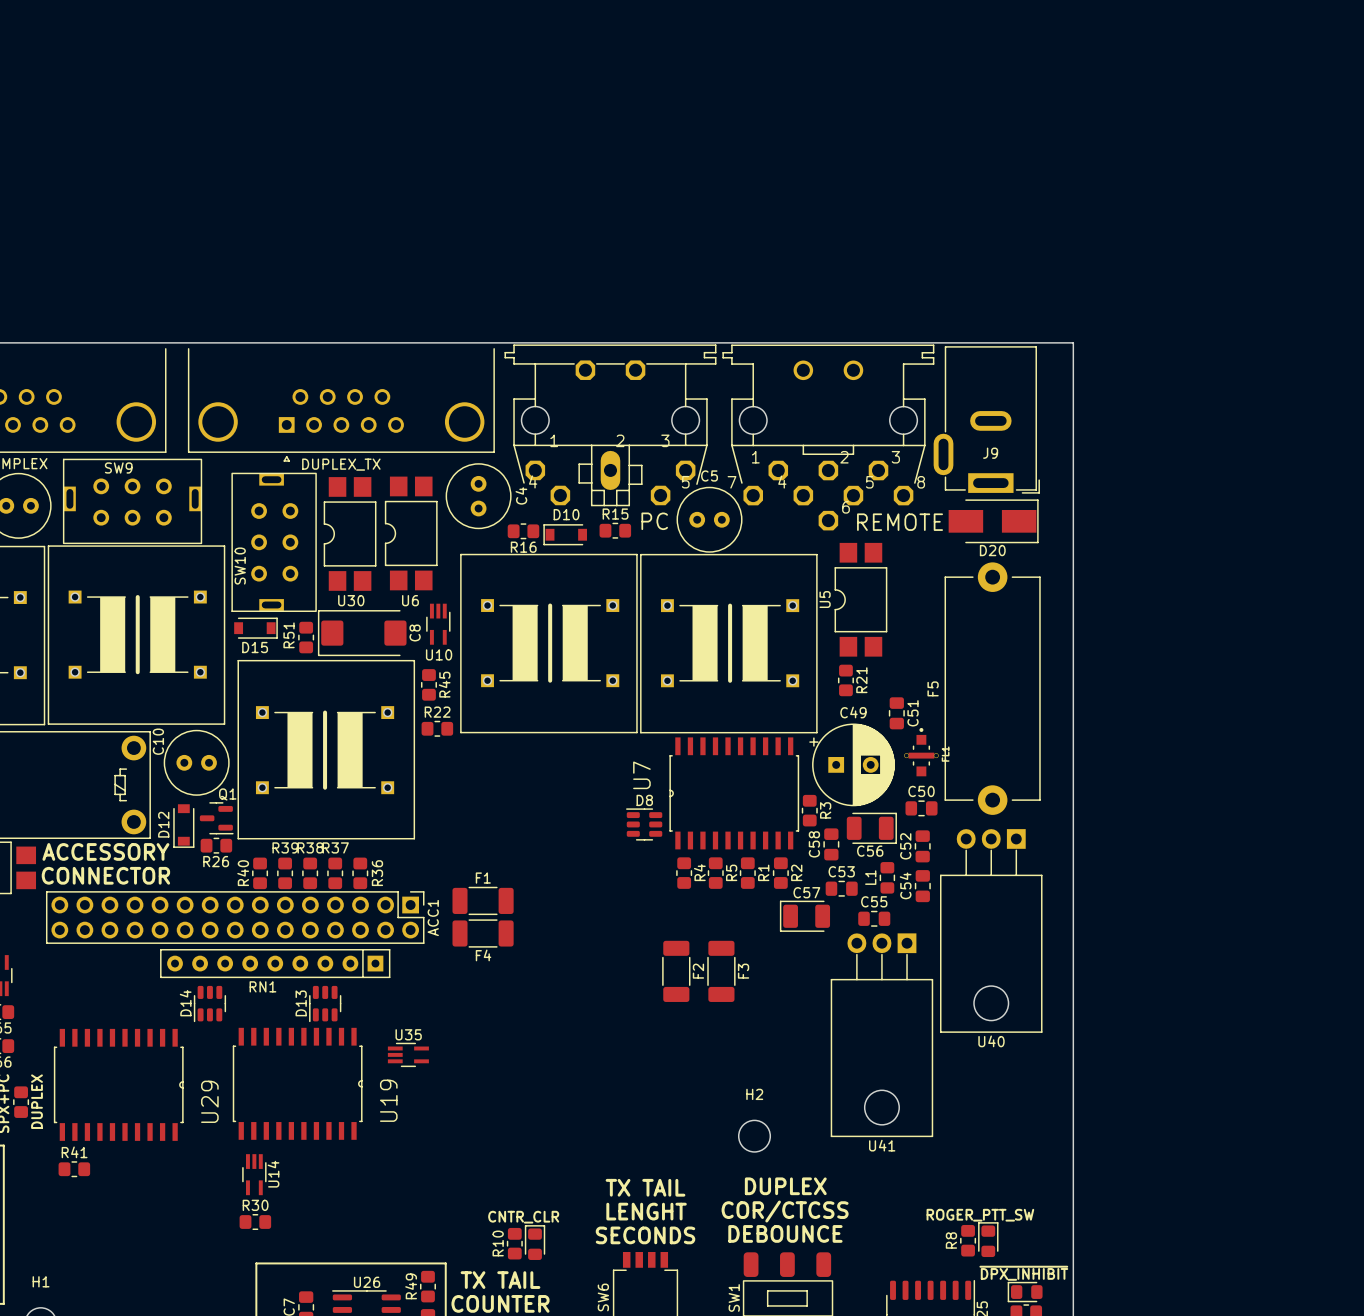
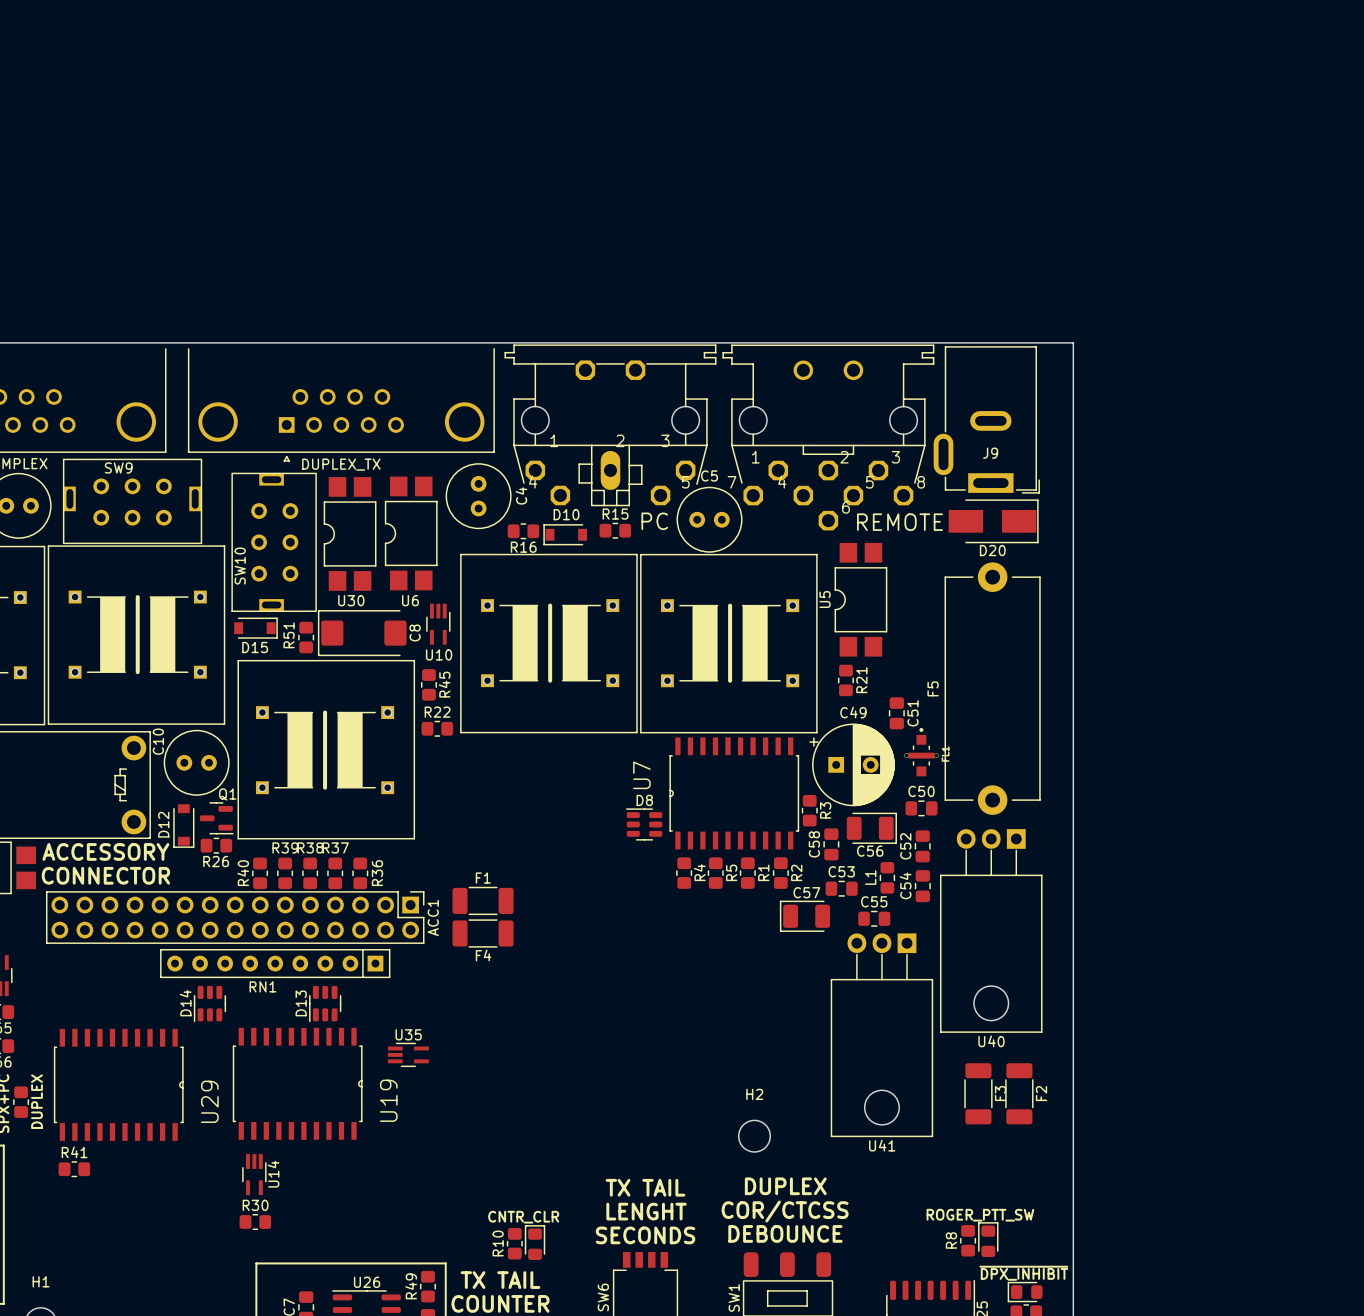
F2 position: (676, 971) -> (1019, 1093)
F3 position: (721, 971) -> (978, 1093)

